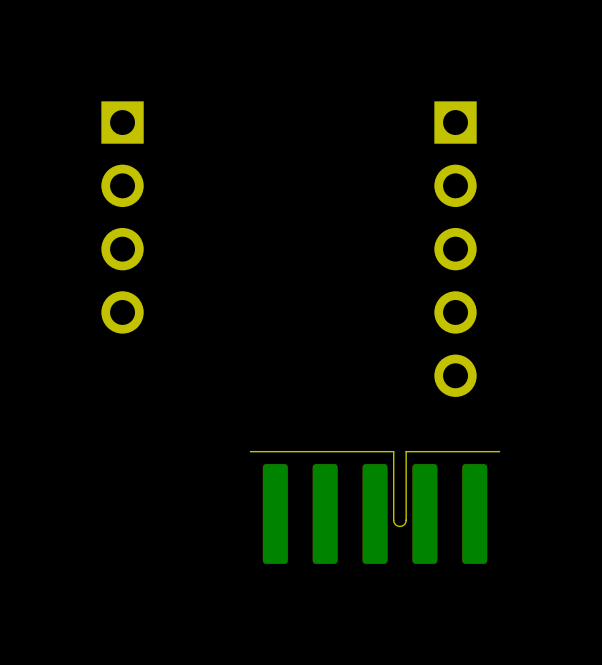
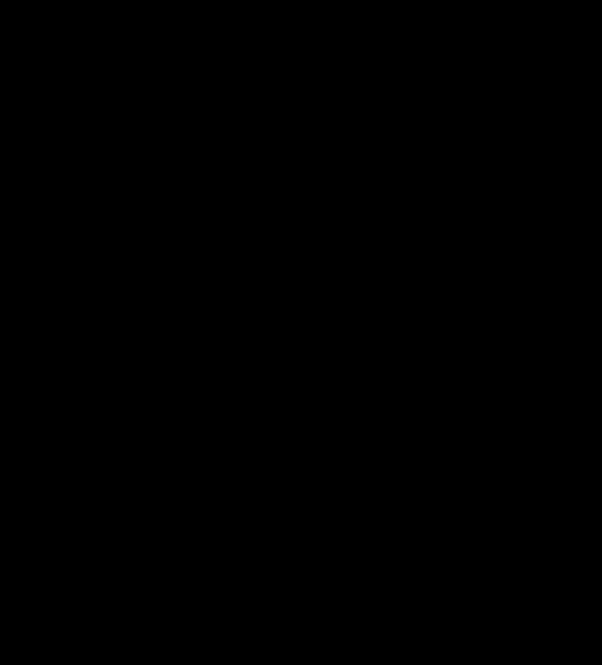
part: (122, 217) -> none
part: (455, 249) -> none
part: (375, 507) -> none

